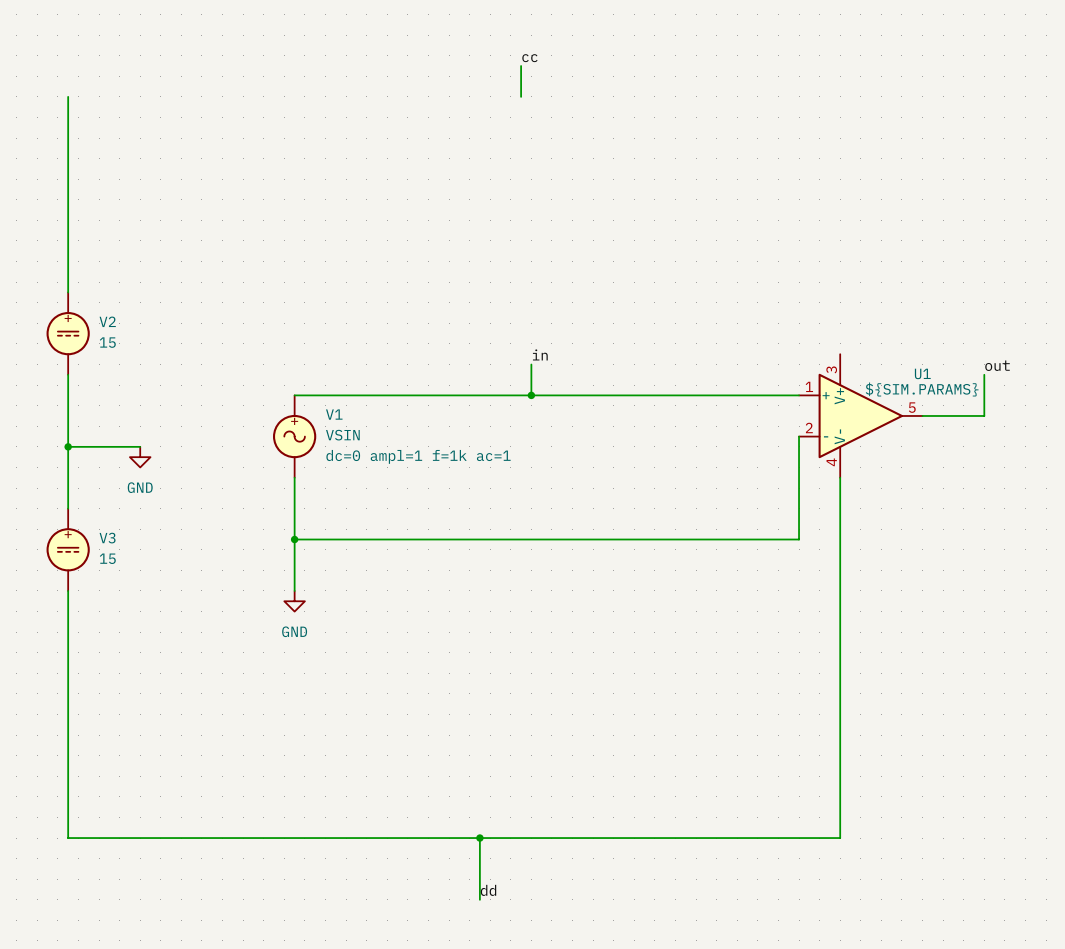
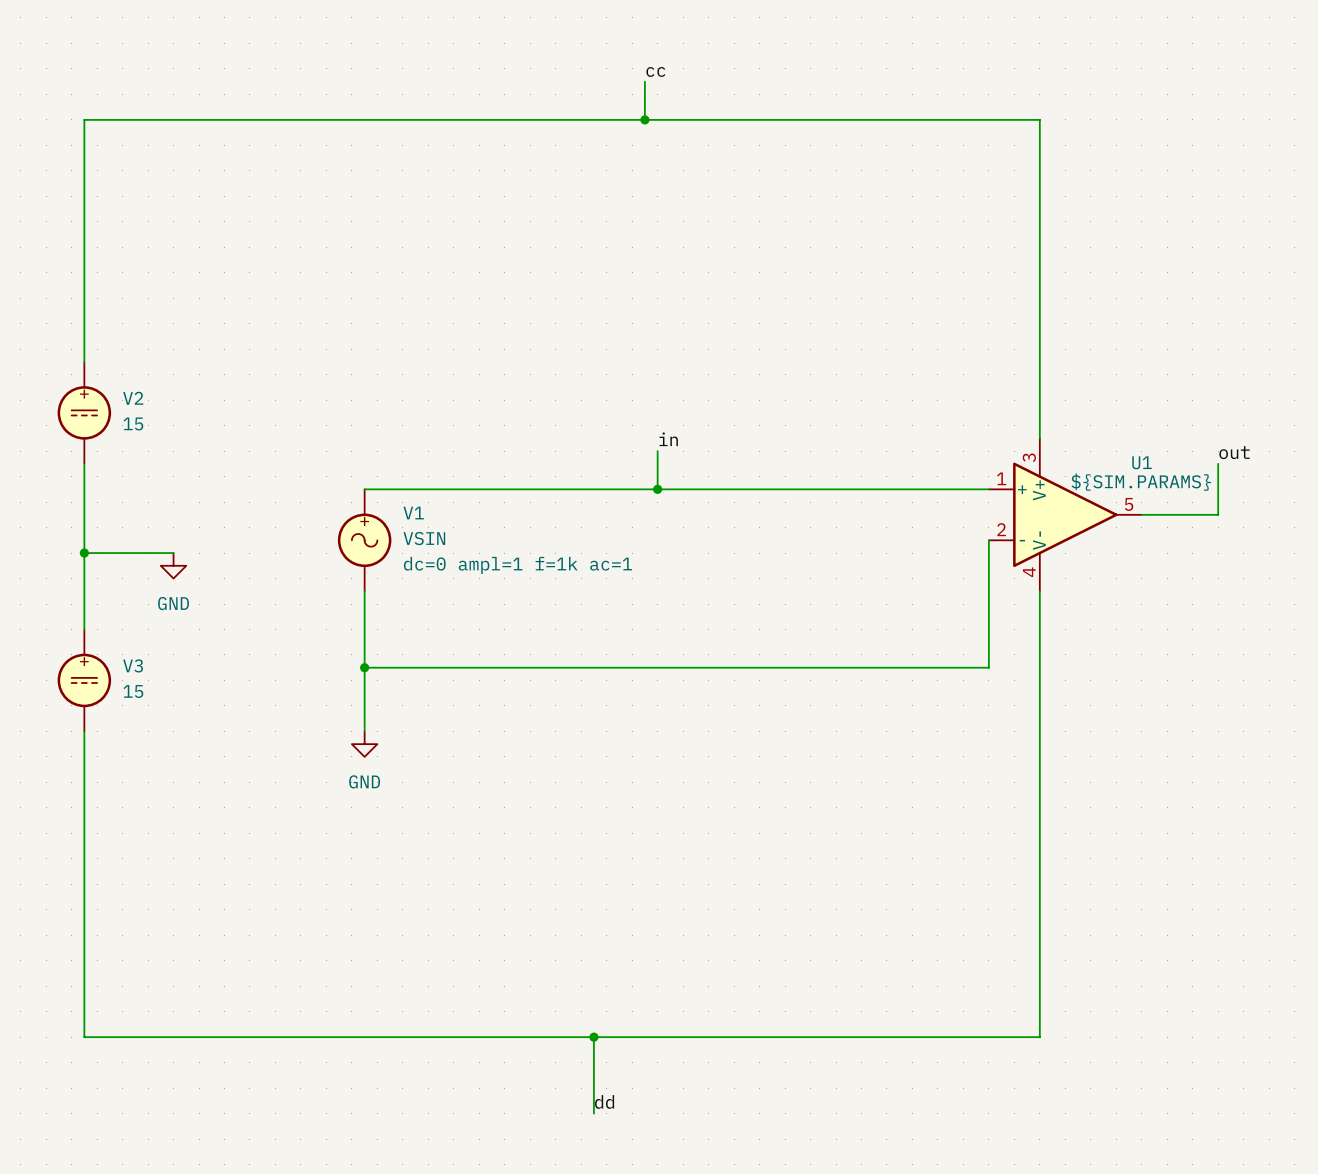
wire: none -> (84, 119) (1039, 119) (1039, 438)
junction: none -> (644, 119)

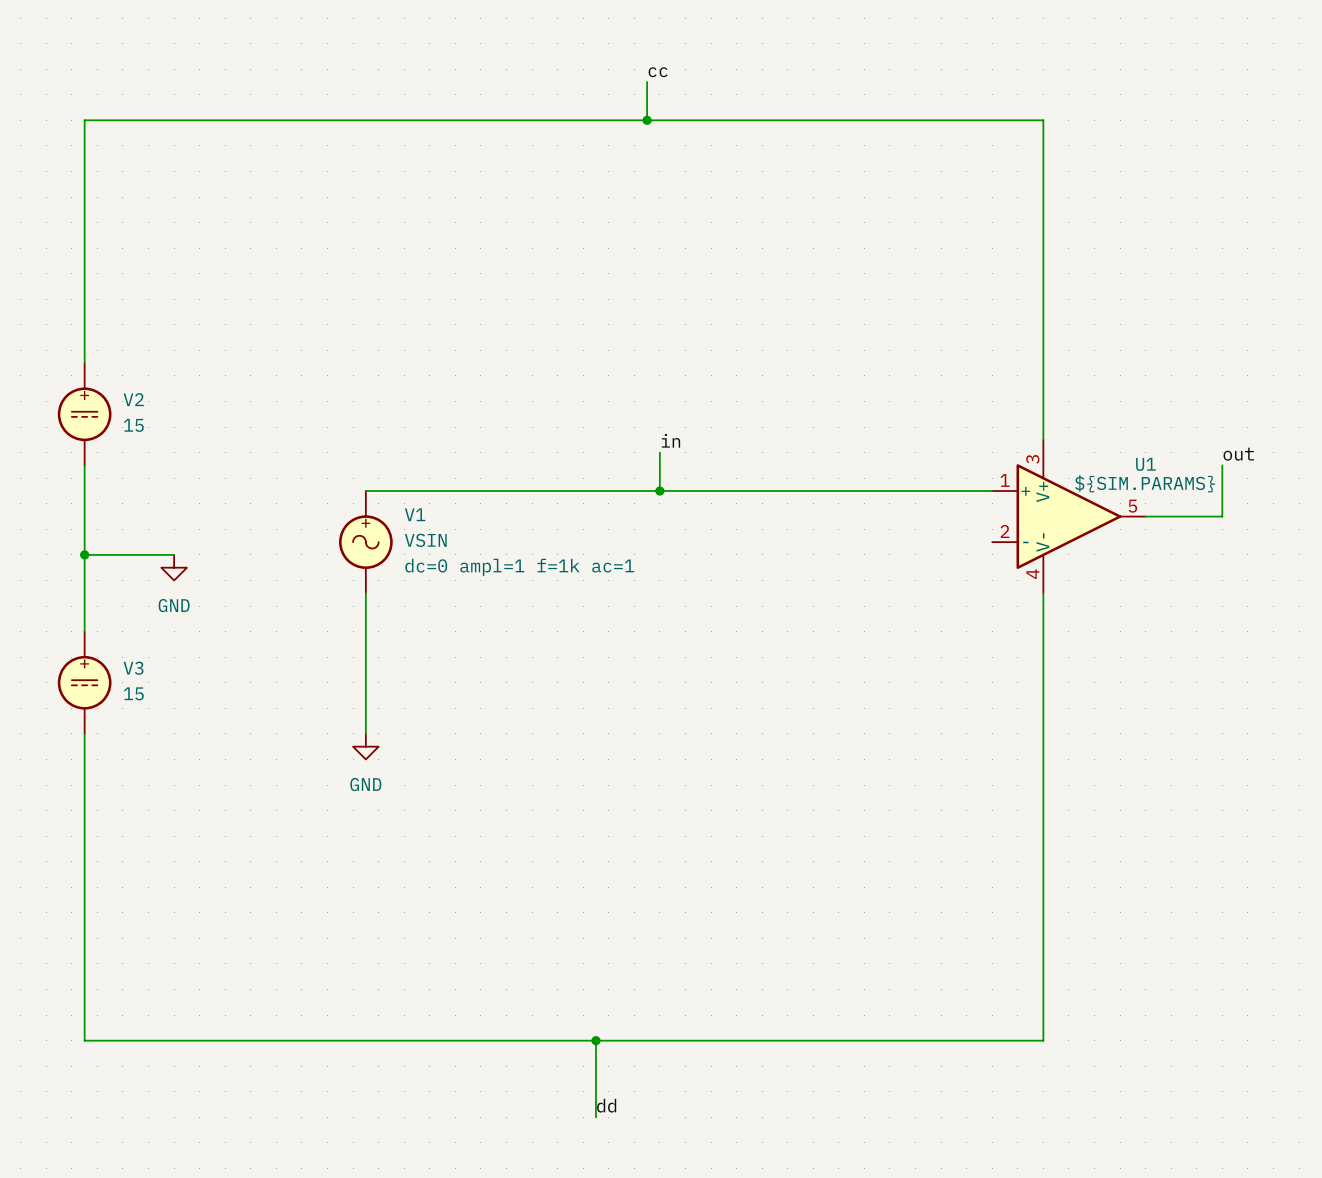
wire: (988, 540) (988, 667) (364, 667) -> none
junction: (364, 667) -> none

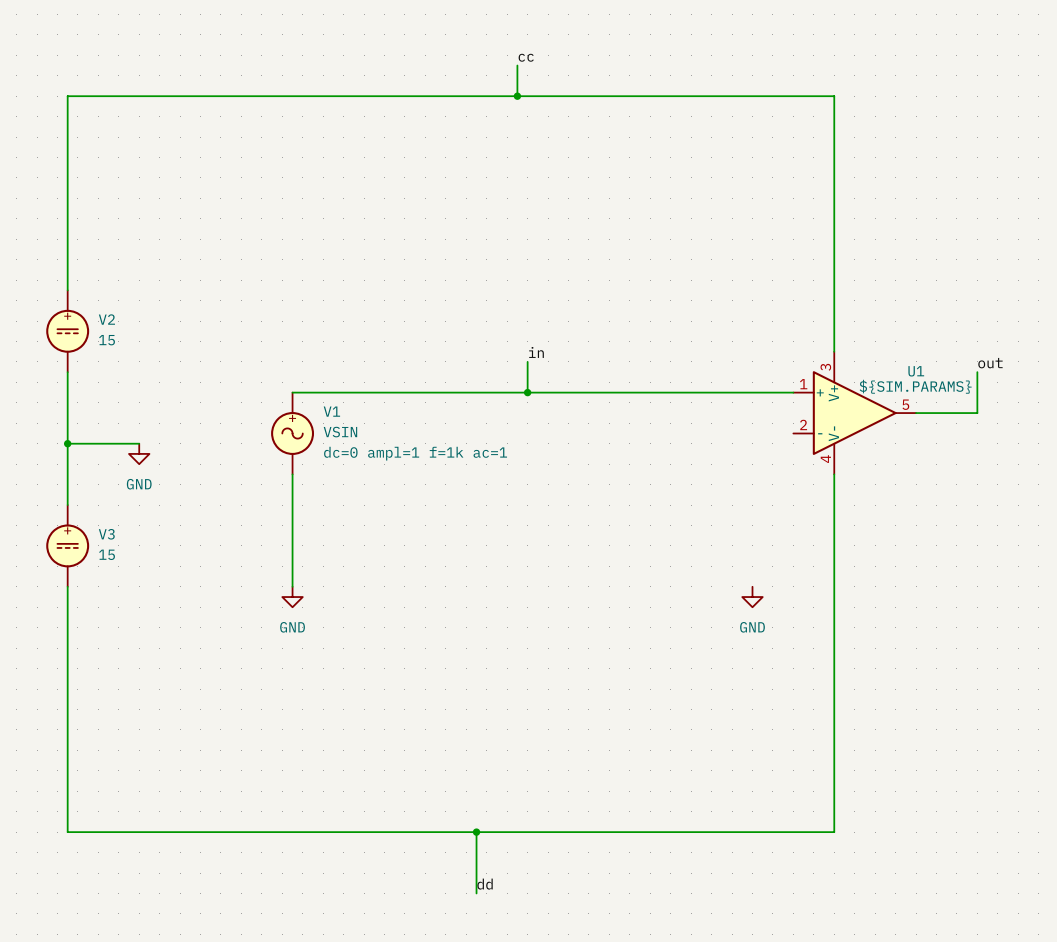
power symbol: none -> GND (752, 597)

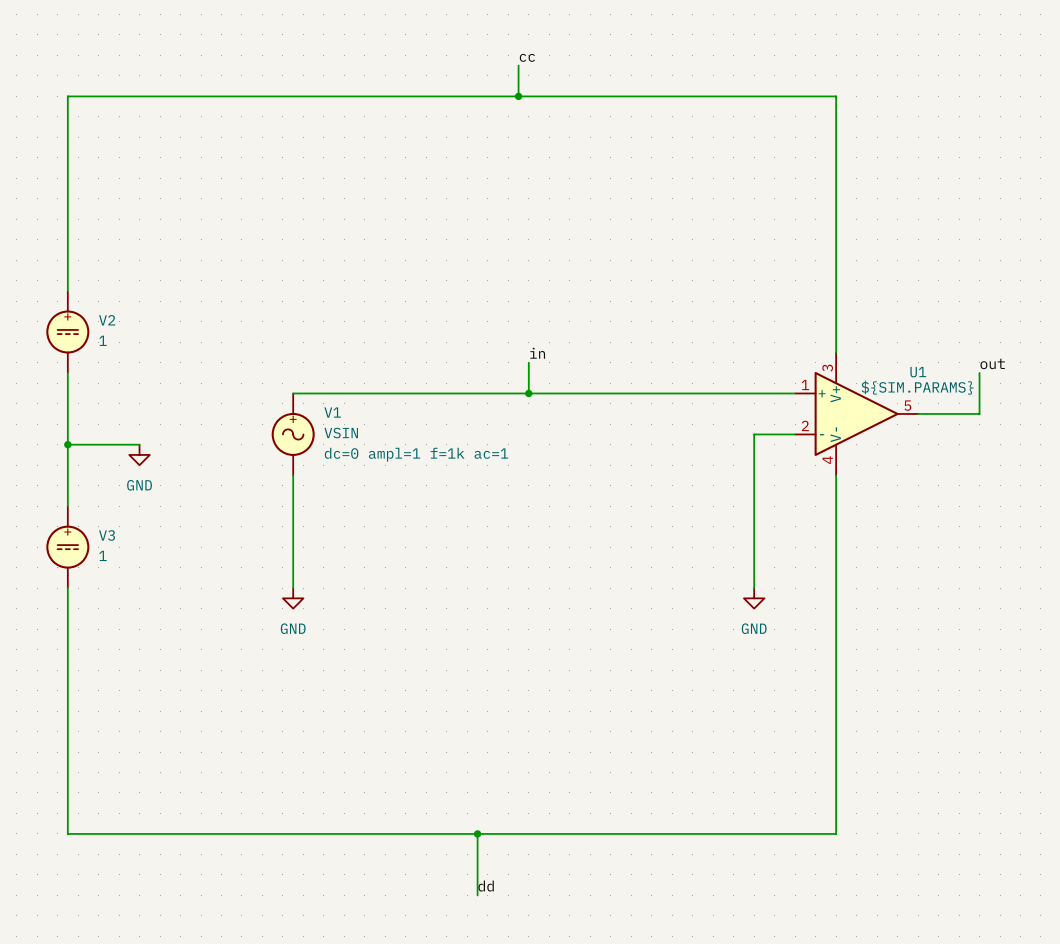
V2 value: 15 (107, 340) -> 1 (103, 340)
wire: none -> (795, 434) (754, 434) (754, 588)
V3 value: 15 (107, 554) -> 1 (103, 555)

